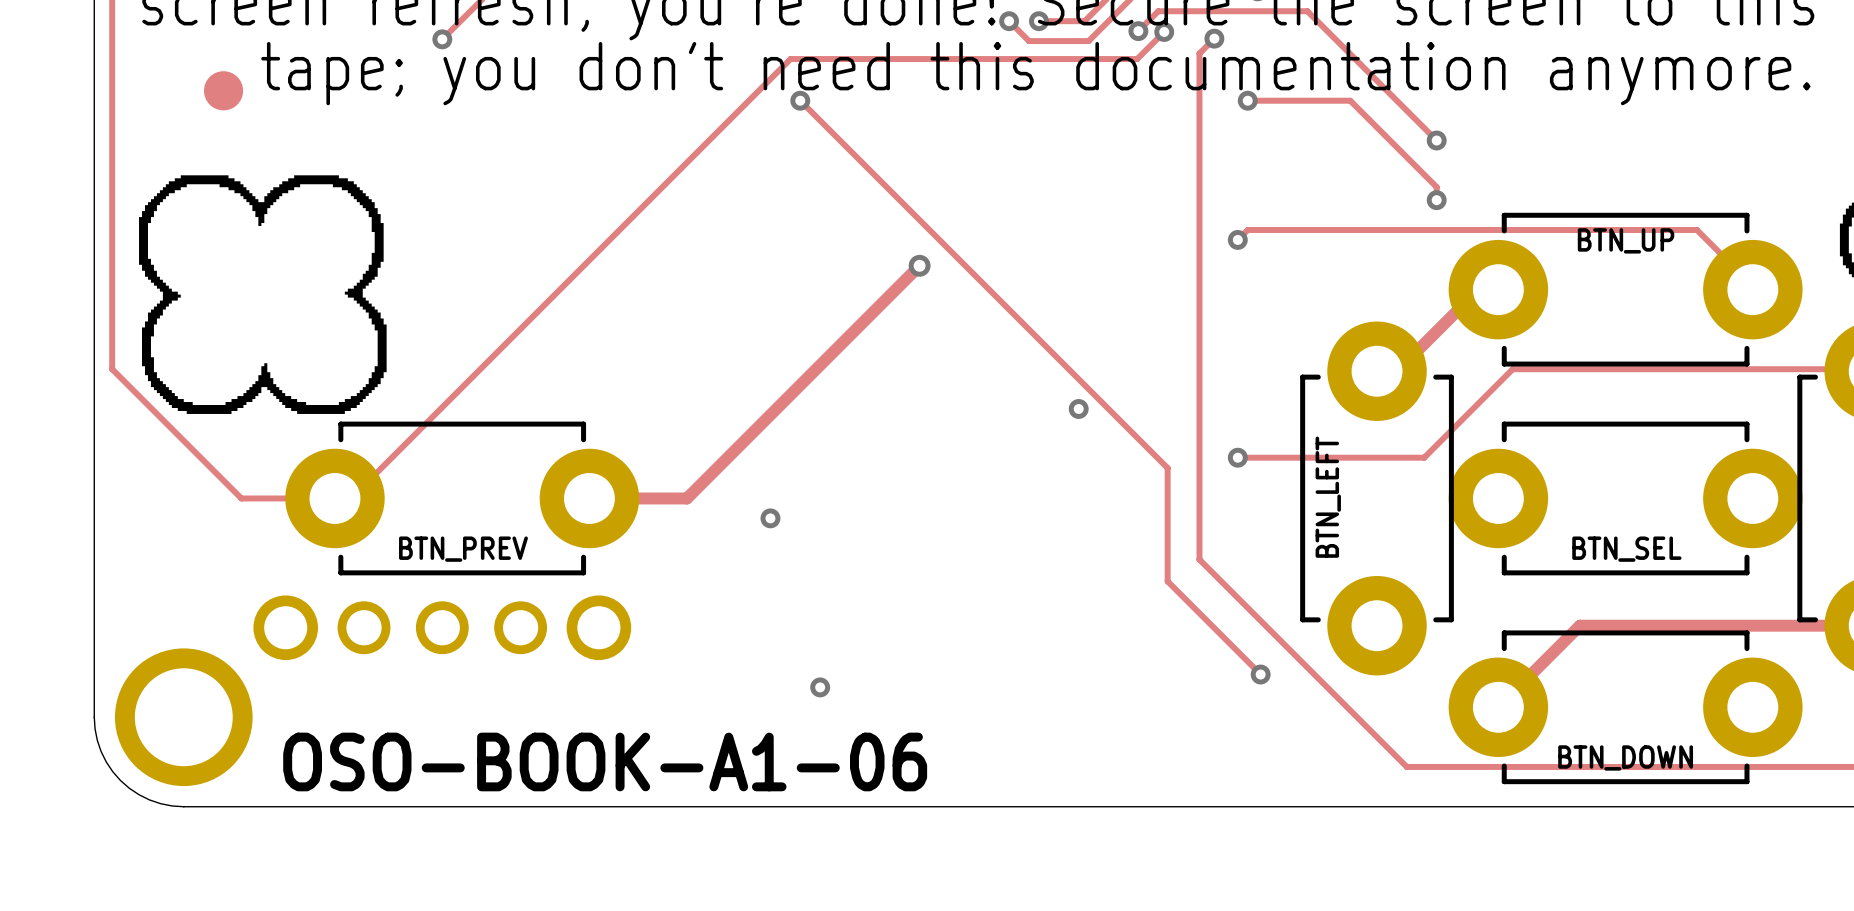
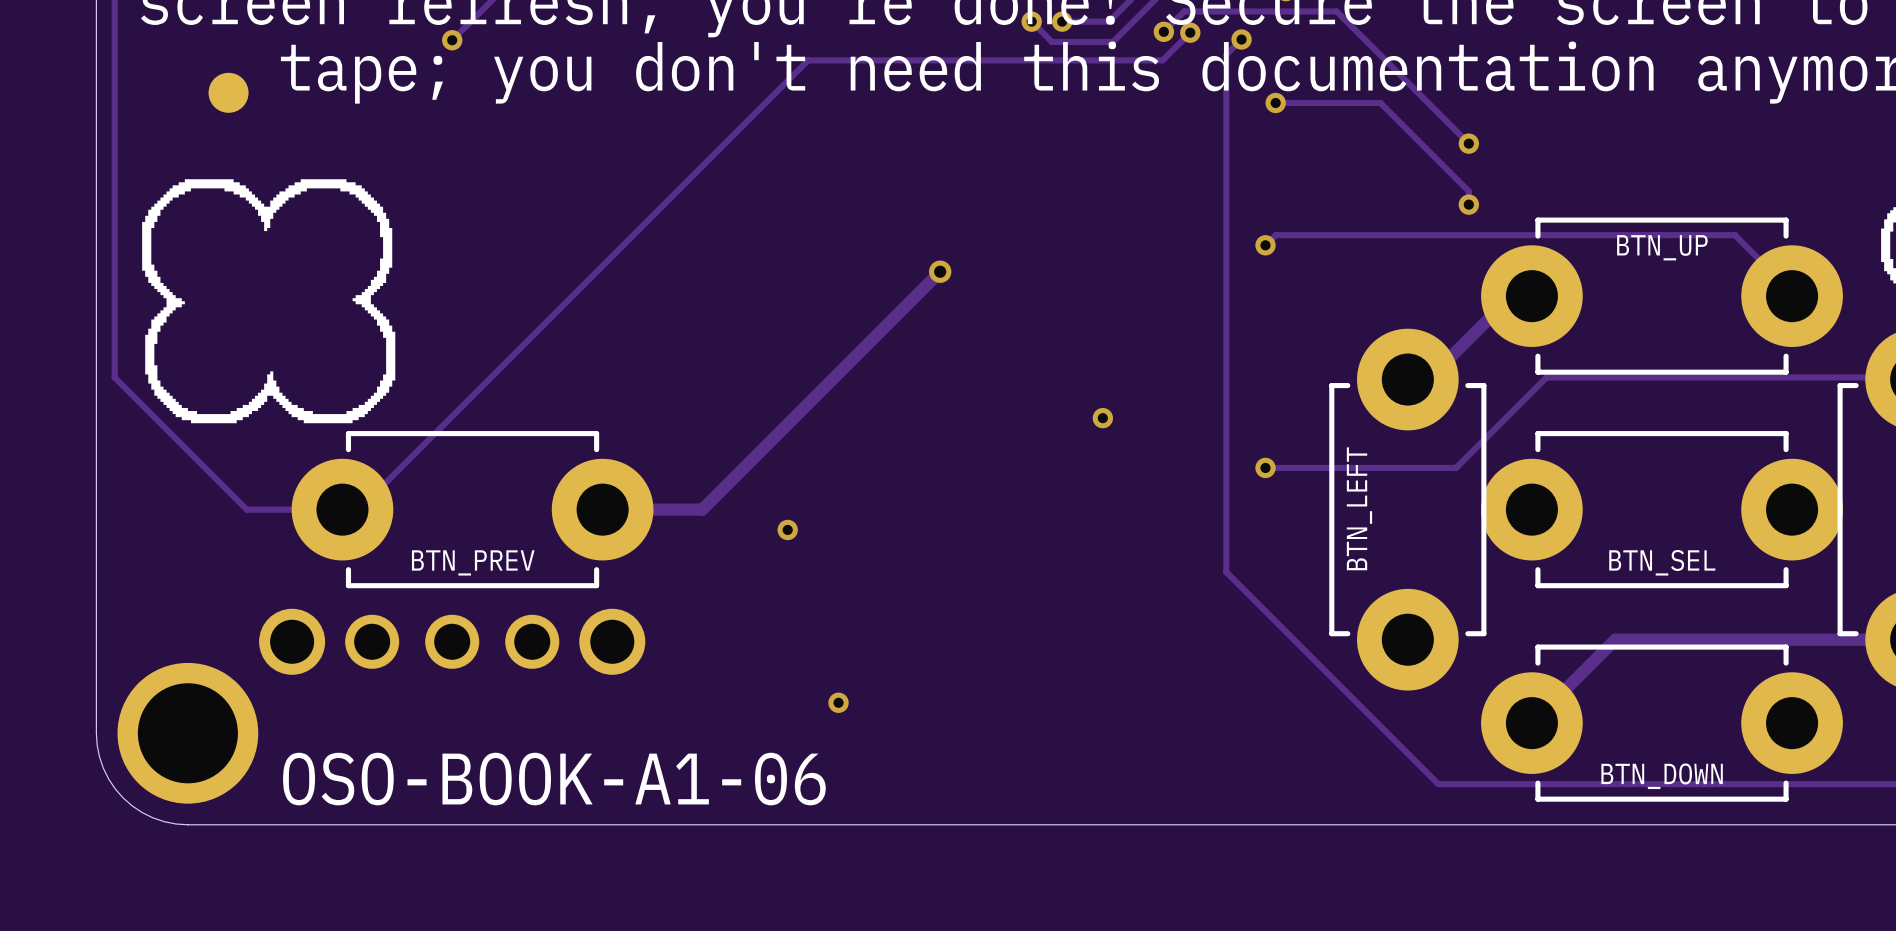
track: (800, 100) (1167, 468) (1167, 581) (1260, 674) -> none
via: (800, 100) -> none
via: (1260, 674) -> none

